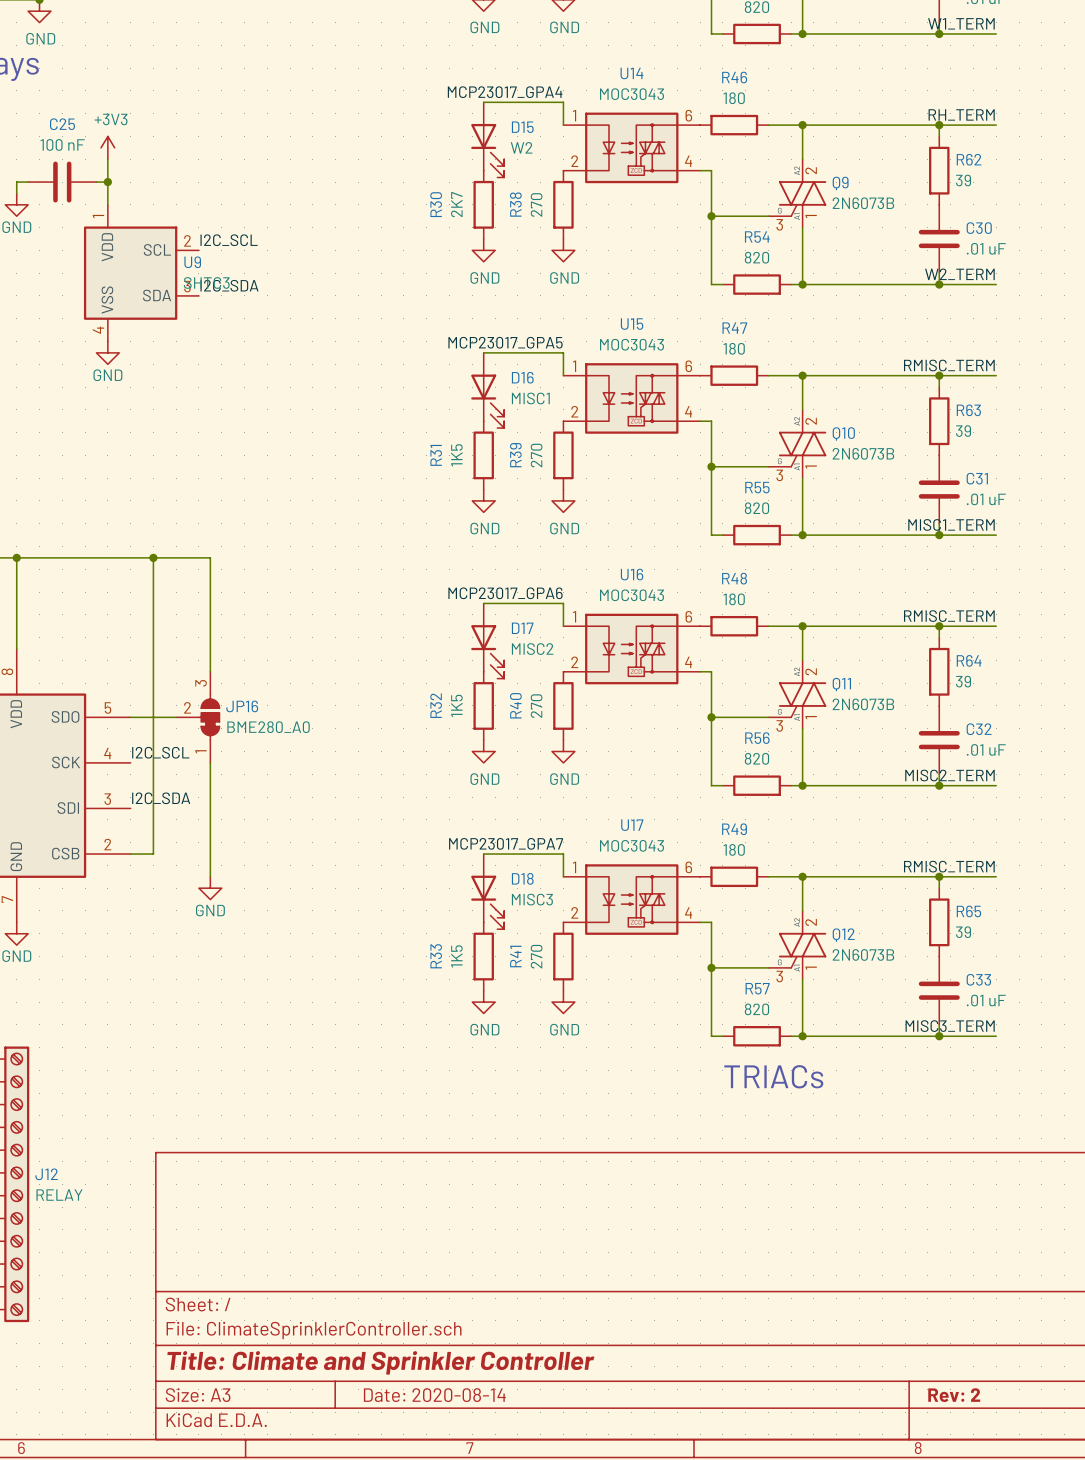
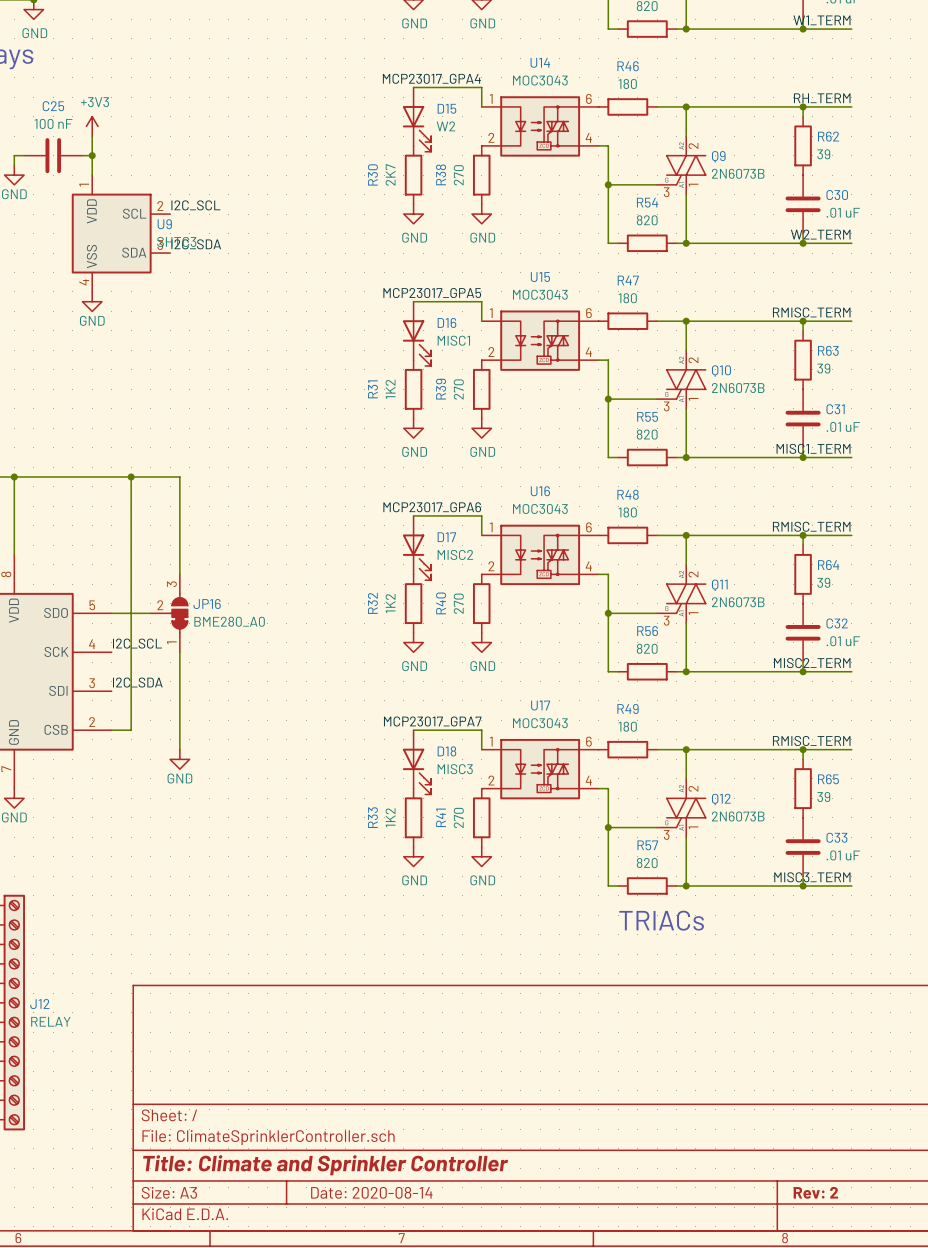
R31 value: 1K5 (456, 455) -> 1K2 (390, 389)
R32 value: 1K5 (456, 705) -> 1K2 (390, 603)
R33 value: 1K5 (456, 956) -> 1K2 (390, 817)

